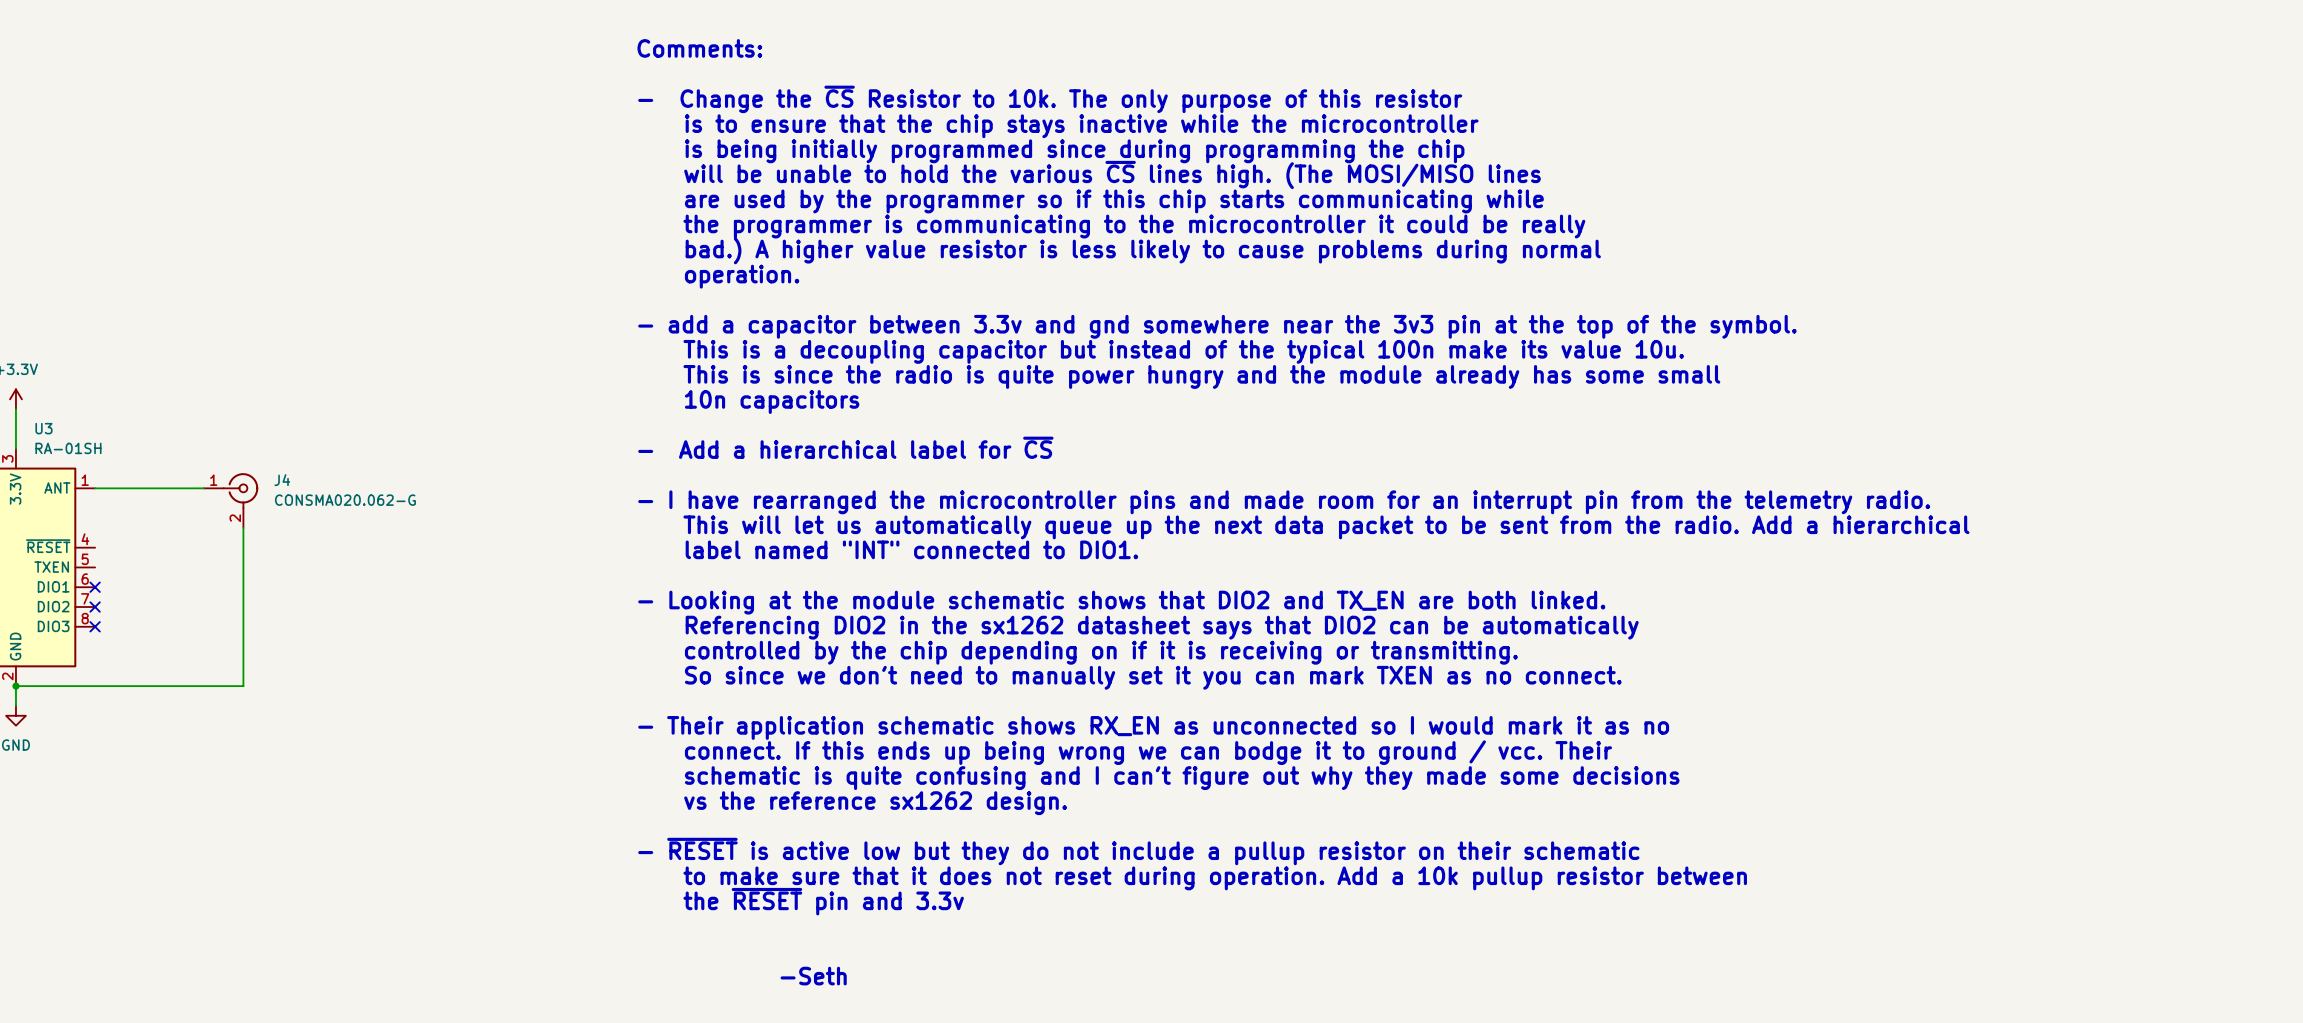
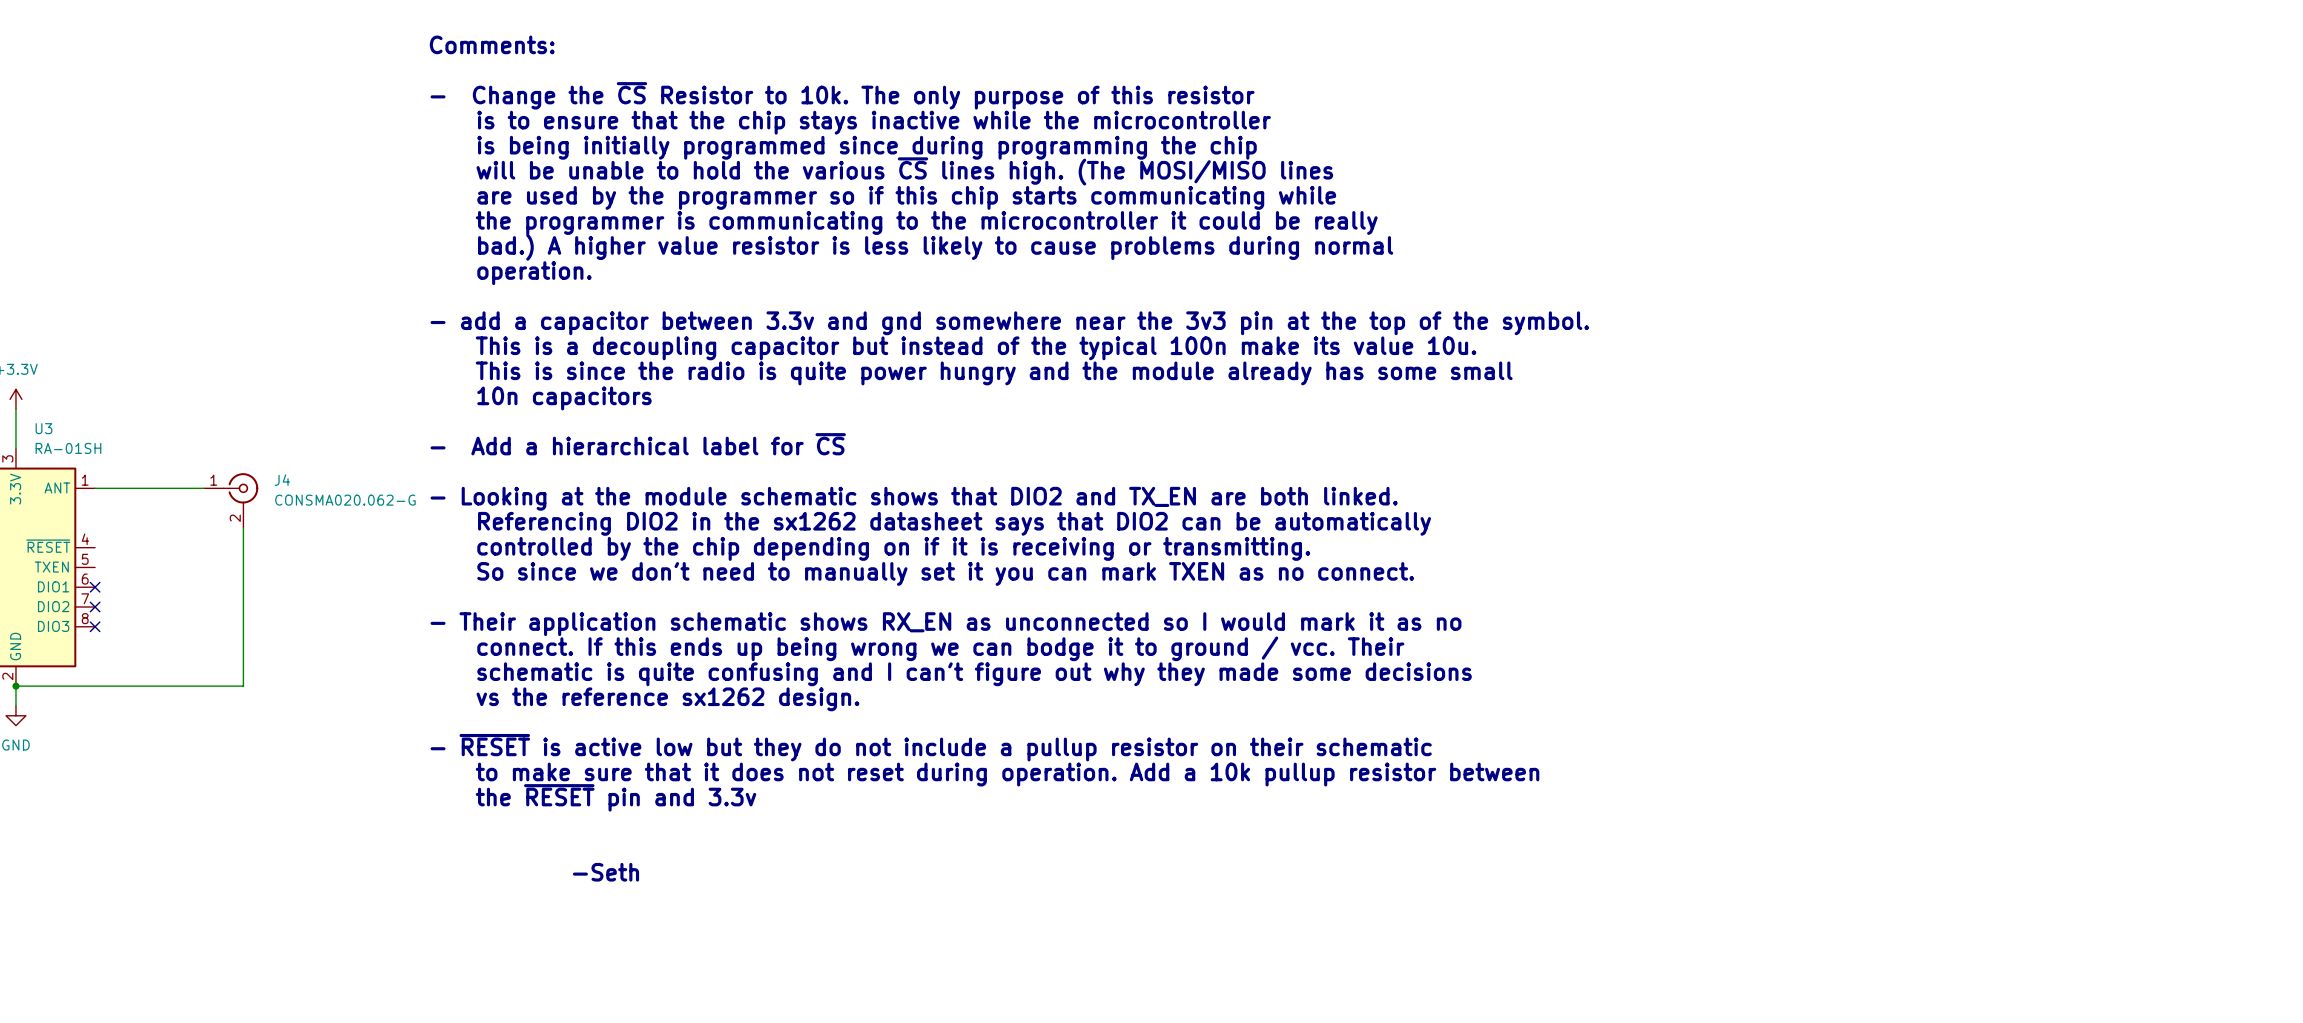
text: none -> Comments: (492, 44)
text: Comments: (699, 48) -> none
text: none -> - Change the ~{CS} Resistor to 10k. The only purpose of this resistor (842, 95)
text: - Change the ~{CS} Resistor to 10k. The only purpose of this resistor (1050, 99) -> none
text: none -> is to ensure that the chip stays inactive while the microcontroller (874, 122)
text: is to ensure that the chip stays inactive while the microcontroller (1081, 126) -> none
text: none -> is being initially programmed since during programming the chip (867, 147)
text: is being initially programmed since during programming the chip (1074, 151) -> none
text: none -> will be unable to hold the various ~{CS} lines high. (The MOSI/MISO lines (904, 171)
text: will be unable to hold the various ~{CS} lines high. (The MOSI/MISO lines (1112, 174) -> none
text: none -> are used by the programmer so if this chip starts communicating while (906, 197)
text: are used by the programmer so if this chip starts communicating while (1114, 201) -> none
text: none -> the programmer is communicating to the microcontroller it could be really (926, 222)
text: the programmer is communicating to the microcontroller it could be really (1134, 226) -> none
text: none -> bad.) A higher value resistor is less likely to cause problems during normal (935, 247)
text: bad.) A higher value resistor is less likely to cause problems during normal (1143, 250) -> none
text: none -> operation. (534, 273)
text: operation. (742, 276) -> none
text: none -> - add a capacitor between 3.3v and gnd somewhere near the 3v3 pin at the top of the symbol. (1009, 323)
text: - add a capacitor between 3.3v and gnd somewhere near the 3v3 pin at the top of the symbol. (1217, 326) -> none
text: none -> This is a decoupling capacitor but instead of the typical 100n make its value 10u. (976, 348)
text: This is a decoupling capacitor but instead of the typical 100n make its value 10u. (1183, 351) -> none
text: none -> This is since the radio is quite power hungry and the module already has some small (994, 373)
text: This is since the radio is quite power hungry and the module already has some small (1201, 376) -> none
text: none -> 10n capacitors (564, 398)
text: 10n capacitors (772, 402) -> none
text: none -> - Add a hierarchical label for ~{CS} (638, 444)
text: - Add a hierarchical label for ~{CS} (845, 447) -> none
text: none -> - Looking at the module schematic shows that DIO2 and TX_EN are both linked. (914, 498)
text: - I have rearranged the microcontroller pins and made room for an interrupt pin from the telemetry radio. (1284, 502) -> none
text: none -> Referencing DIO2 in the sx1262 datasheet says that DIO2 can be automatically (954, 523)
text: This will let us automatically queue up the next data packet to be sent from the radio. Add a hierarchical (1326, 527) -> none
text: none -> controlled by the chip depending on if it is receiving or transmitting. (893, 548)
text: label named "INT" connected to DIO1. (911, 549) -> none
text: none -> So since we don't need to manually set it you can mark TXEN as no connect. (945, 573)
text: - Looking at the module schematic shows that DIO2 and TX_EN are both linked. (1121, 602) -> none
text: none -> - Their application schematic shows RX_EN as unconnected so I would mark it as no (946, 624)
text: Referencing DIO2 in the sx1262 datasheet says that DIO2 can be automatically (1162, 627) -> none
text: none -> connect. If this ends up being wrong we can bodge it to ground / vcc. Their (940, 648)
text: controlled by the chip depending on if it is receiving or transmitting. (1101, 652) -> none
text: none -> schematic is quite confusing and I can't figure out why they made some decisions (974, 674)
text: So since we don't need to manually set it you can mark TXEN as no connect. (1153, 677) -> none
text: none -> vs the reference sx1262 design. (667, 699)
text: - Their application schematic shows RX_EN as unconnected so I would mark it as no (1153, 727) -> none
text: none -> - ~{RESET} is active low but they do not include a pullup resistor on their schematic (931, 747)
text: connect. If this ends up being wrong we can bodge it to ground / vcc. Their (1148, 752) -> none
text: none -> to make sure that it does not reset during operation. Add a 10k pullup resistor between (1007, 774)
text: schematic is quite confusing and I can't figure out why they made some decisions (1182, 778) -> none
text: none -> the ~{RESET} pin and 3.3v (616, 797)
text: vs the reference sx1262 design. (875, 803) -> none
text: - ~{RESET} is active low but they do not include a pullup resistor on their schematic (1138, 851) -> none
text: none -> -Seth (606, 872)
text: to make sure that it does not reset during operation. Add a 10k pullup resistor between (1215, 878) -> none
text: the ~{RESET} pin and 3.3v (823, 901) -> none
text: -Seth (813, 976) -> none

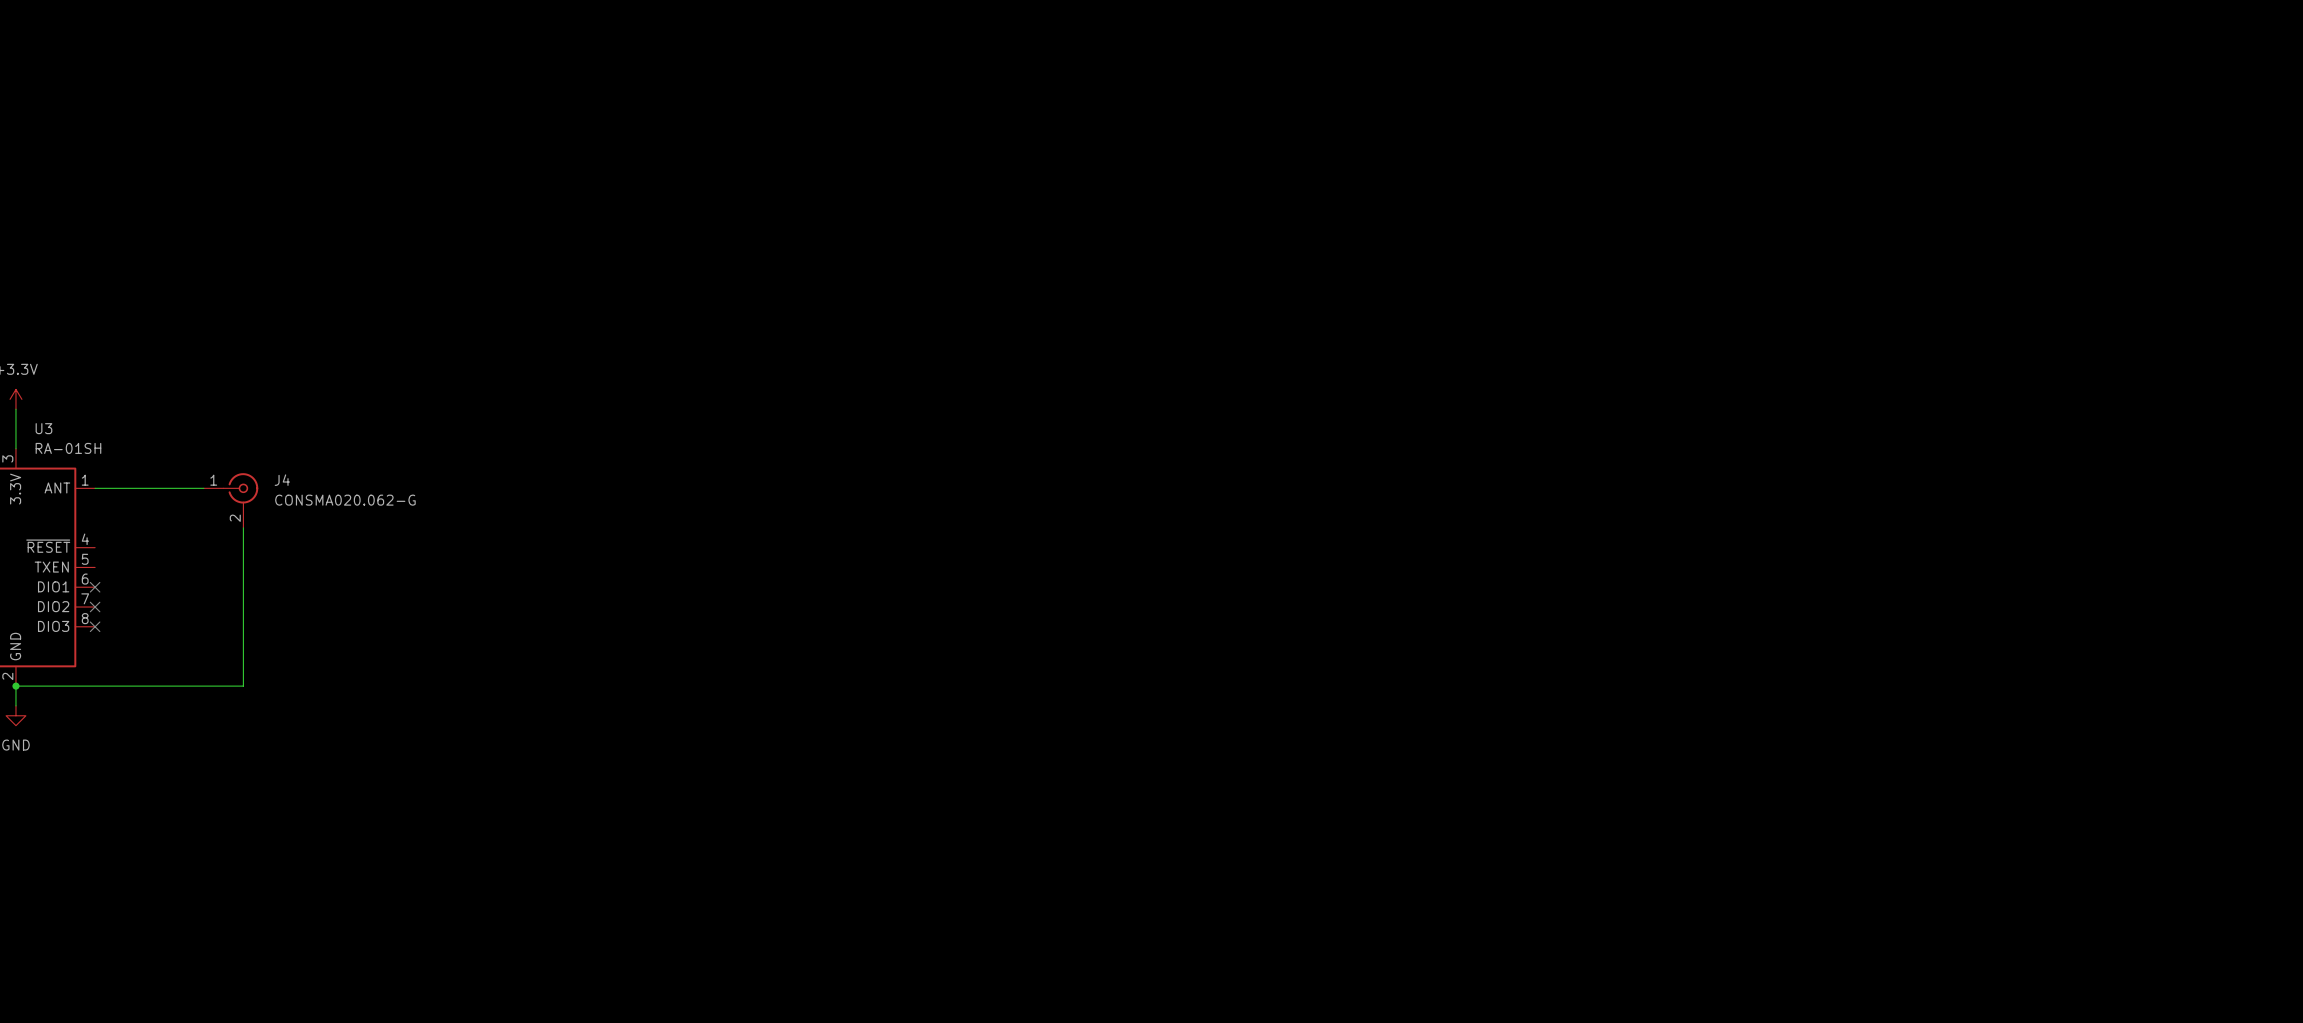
text: Comments: (492, 44) -> none
text: - Change the ~{CS} Resistor to 10k. The only purpose of this resistor (842, 95) -> none
text: is to ensure that the chip stays inactive while the microcontroller (874, 122) -> none
text: is being initially programmed since during programming the chip (867, 147) -> none
text: will be unable to hold the various ~{CS} lines high. (The MOSI/MISO lines (904, 171) -> none
text: are used by the programmer so if this chip starts communicating while (906, 197) -> none
text: the programmer is communicating to the microcontroller it could be really (926, 222) -> none
text: bad.) A higher value resistor is less likely to cause problems during normal (935, 247) -> none
text: operation. (534, 273) -> none
text: - add a capacitor between 3.3v and gnd somewhere near the 3v3 pin at the top of the symbol. (1009, 323) -> none
text: This is a decoupling capacitor but instead of the typical 100n make its value 10u. (976, 348) -> none
text: This is since the radio is quite power hungry and the module already has some small (994, 373) -> none
text: 10n capacitors (564, 398) -> none
text: - Add a hierarchical label for ~{CS} (638, 444) -> none
text: - Looking at the module schematic shows that DIO2 and TX_EN are both linked. (914, 498) -> none
text: Referencing DIO2 in the sx1262 datasheet says that DIO2 can be automatically (954, 523) -> none
text: controlled by the chip depending on if it is receiving or transmitting. (893, 548) -> none
text: So since we don't need to manually set it you can mark TXEN as no connect. (945, 573) -> none
text: - Their application schematic shows RX_EN as unconnected so I would mark it as no (946, 624) -> none
text: connect. If this ends up being wrong we can bodge it to ground / vcc. Their (940, 648) -> none
text: schematic is quite confusing and I can't figure out why they made some decisions (974, 674) -> none
text: vs the reference sx1262 design. (667, 699) -> none
text: - ~{RESET} is active low but they do not include a pullup resistor on their schematic (931, 747) -> none
text: to make sure that it does not reset during operation. Add a 10k pullup resistor between (1007, 774) -> none
text: the ~{RESET} pin and 3.3v (616, 797) -> none
text: -Seth (606, 872) -> none

